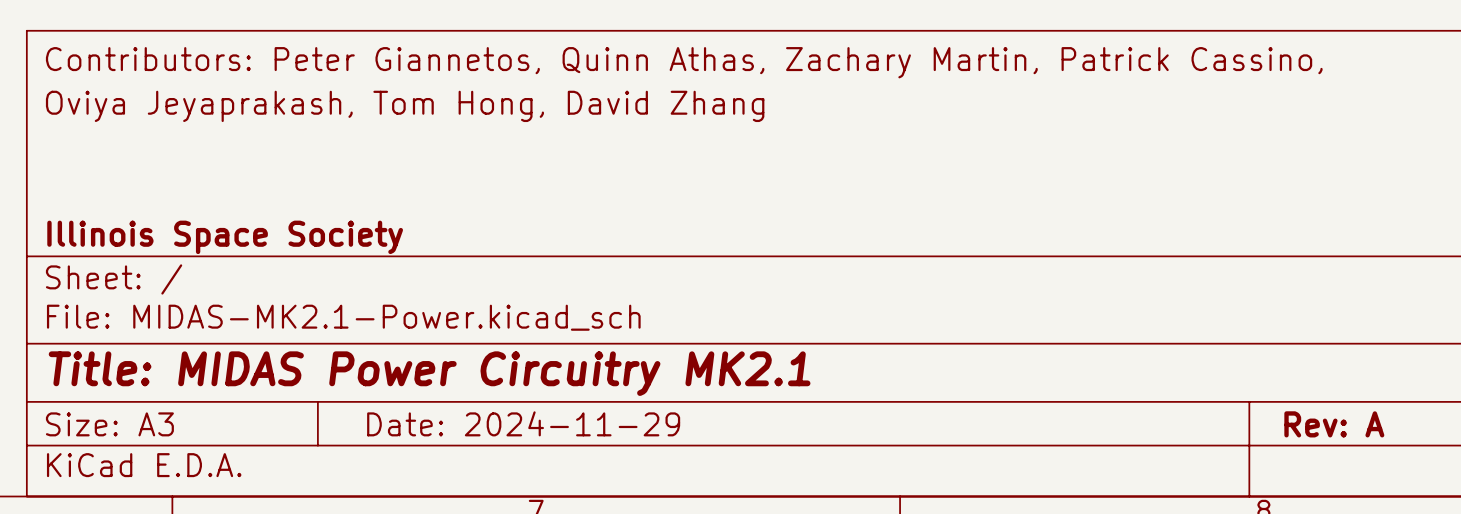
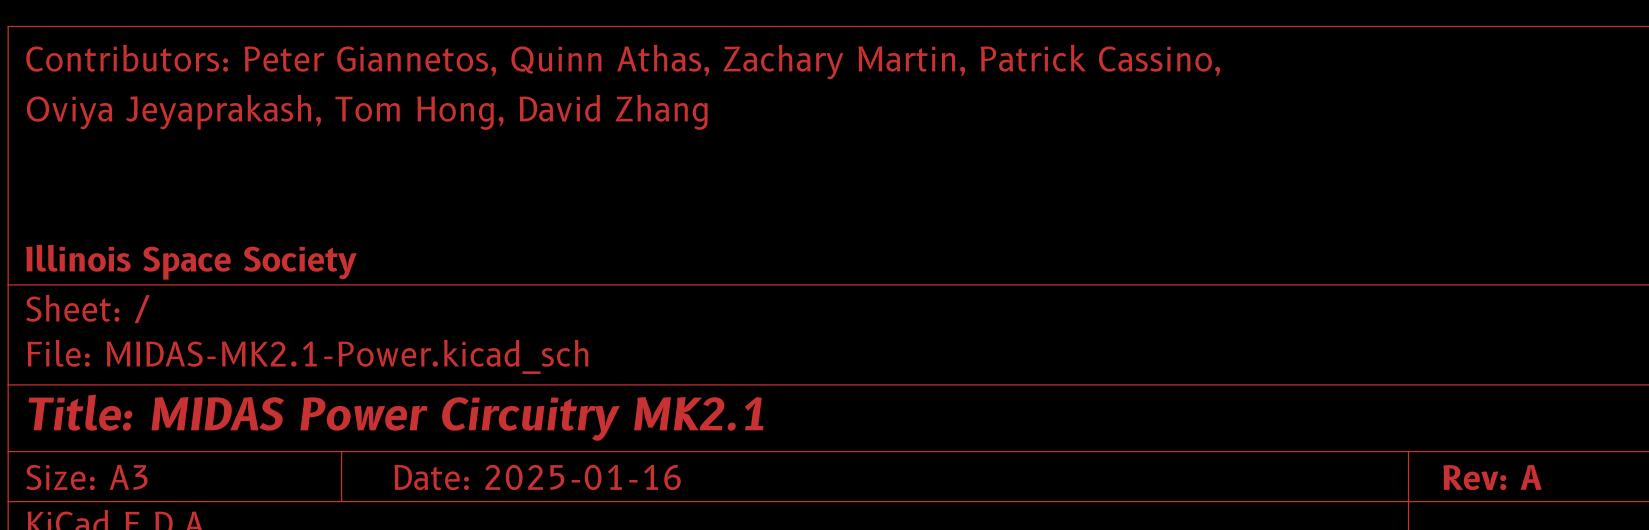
title block: Date: 2024-11-29 (523, 423) -> Date: 2025-01-16 (537, 477)

